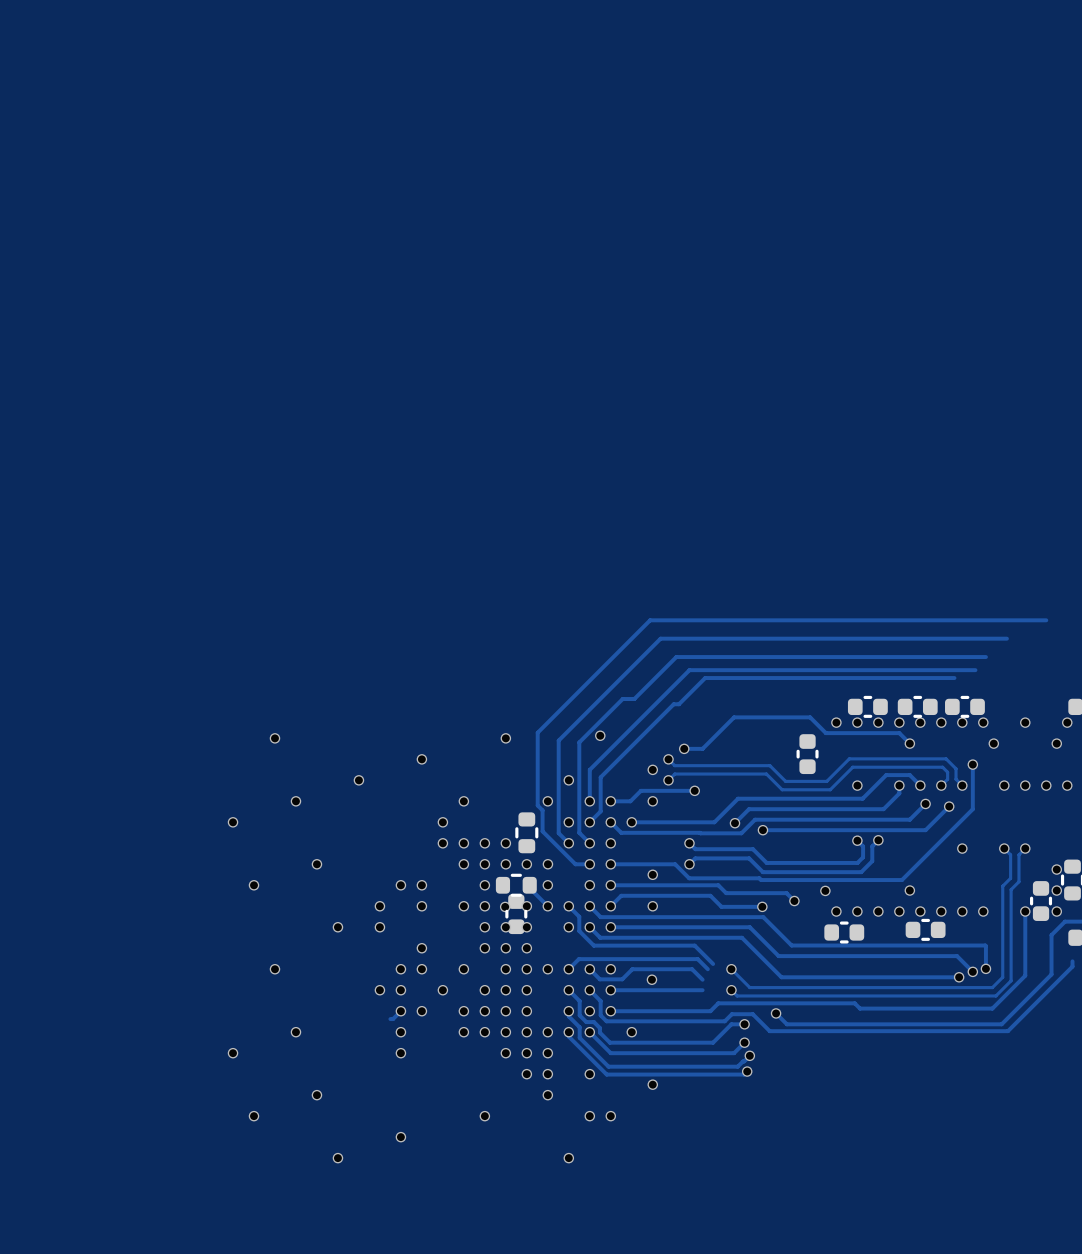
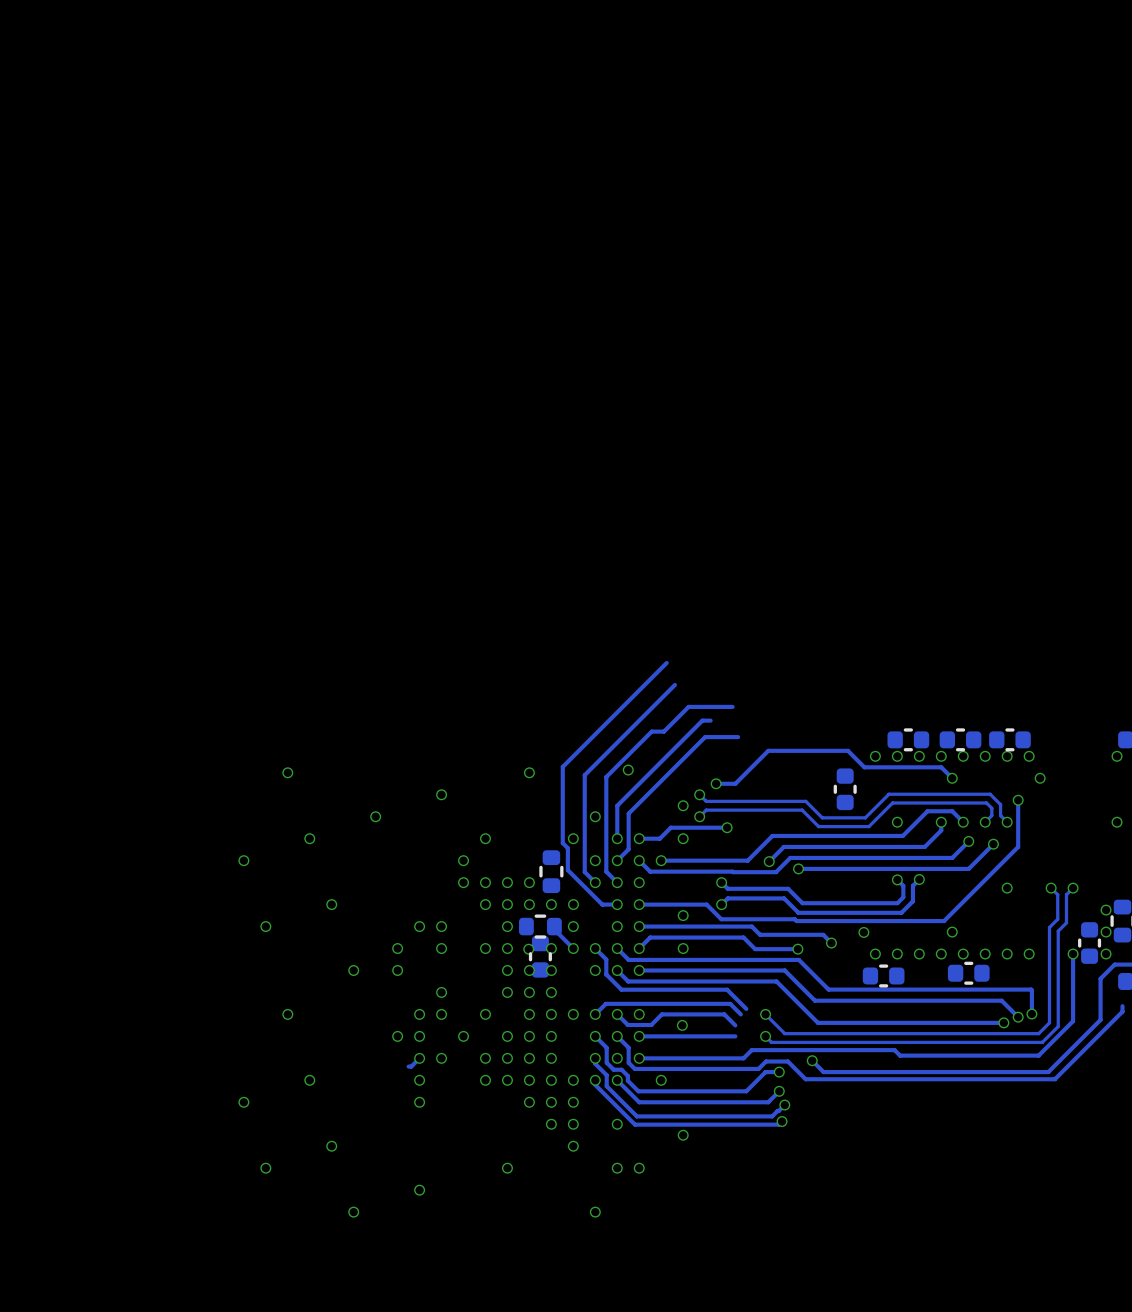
track: (1046, 620) (650, 620) (637, 633) -> none
track: (1006, 638) (660, 638) (644, 654) -> none
track: (985, 657) (676, 657) (658, 675) -> (732, 706) (688, 706)
track: (975, 670) (689, 670) (671, 688) -> (710, 720) (702, 720)
track: (954, 678) (705, 678) (678, 704) -> (738, 737) (710, 737)
via: (1025, 722) -> none
via: (1056, 743) -> none
via: (1004, 785) -> none
via: (1025, 785) -> none
via: (1046, 785) -> none

